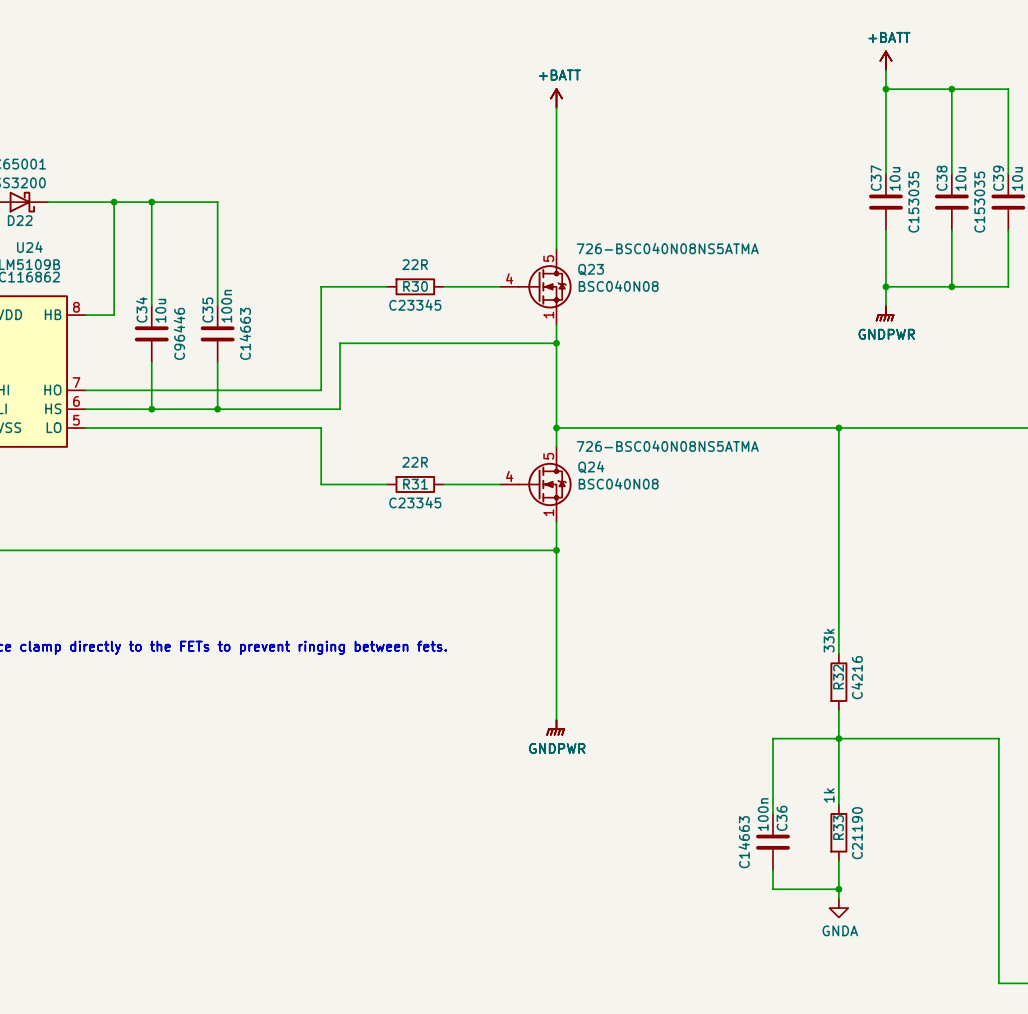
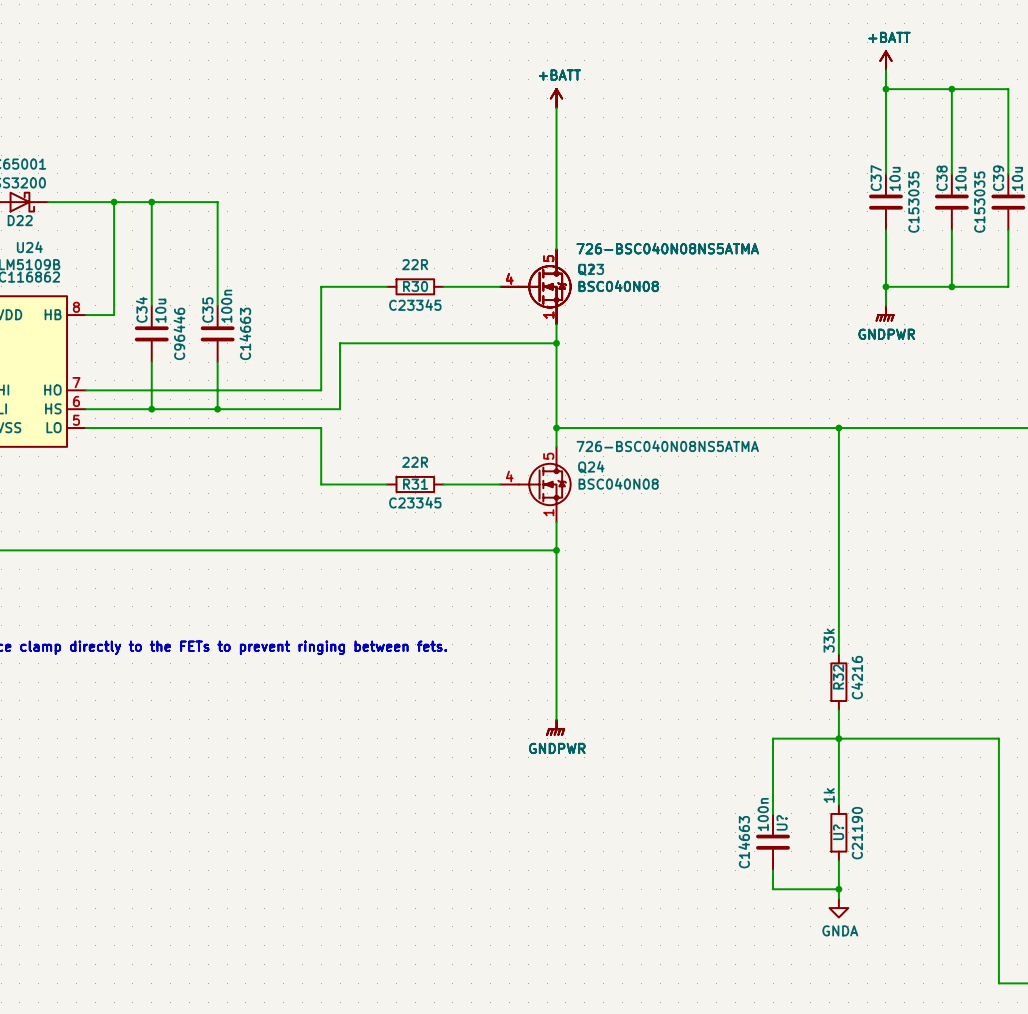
part: none -> BSC040N08 (535, 286)
C36 name: C36 (782, 818) -> U? (782, 822)
R33 name: R33 (838, 827) -> U? (838, 832)

